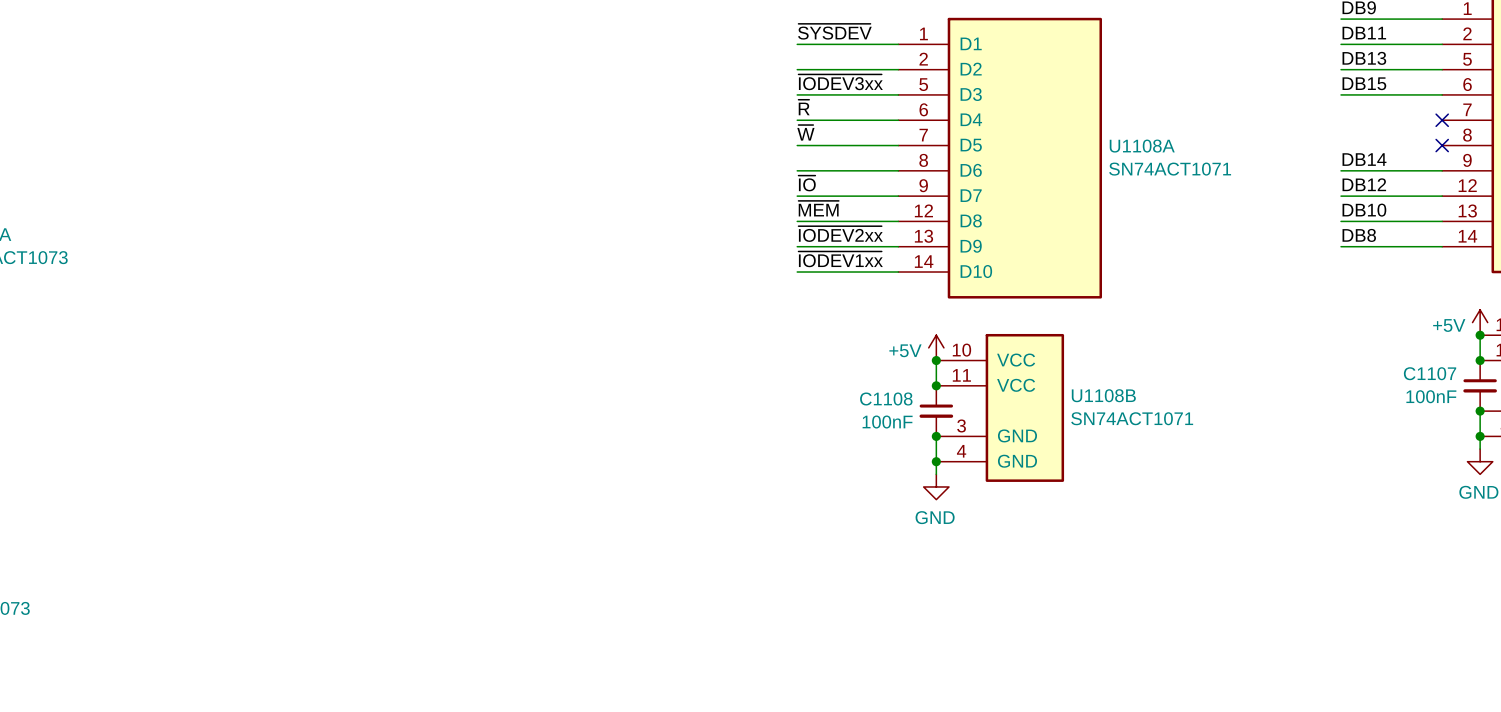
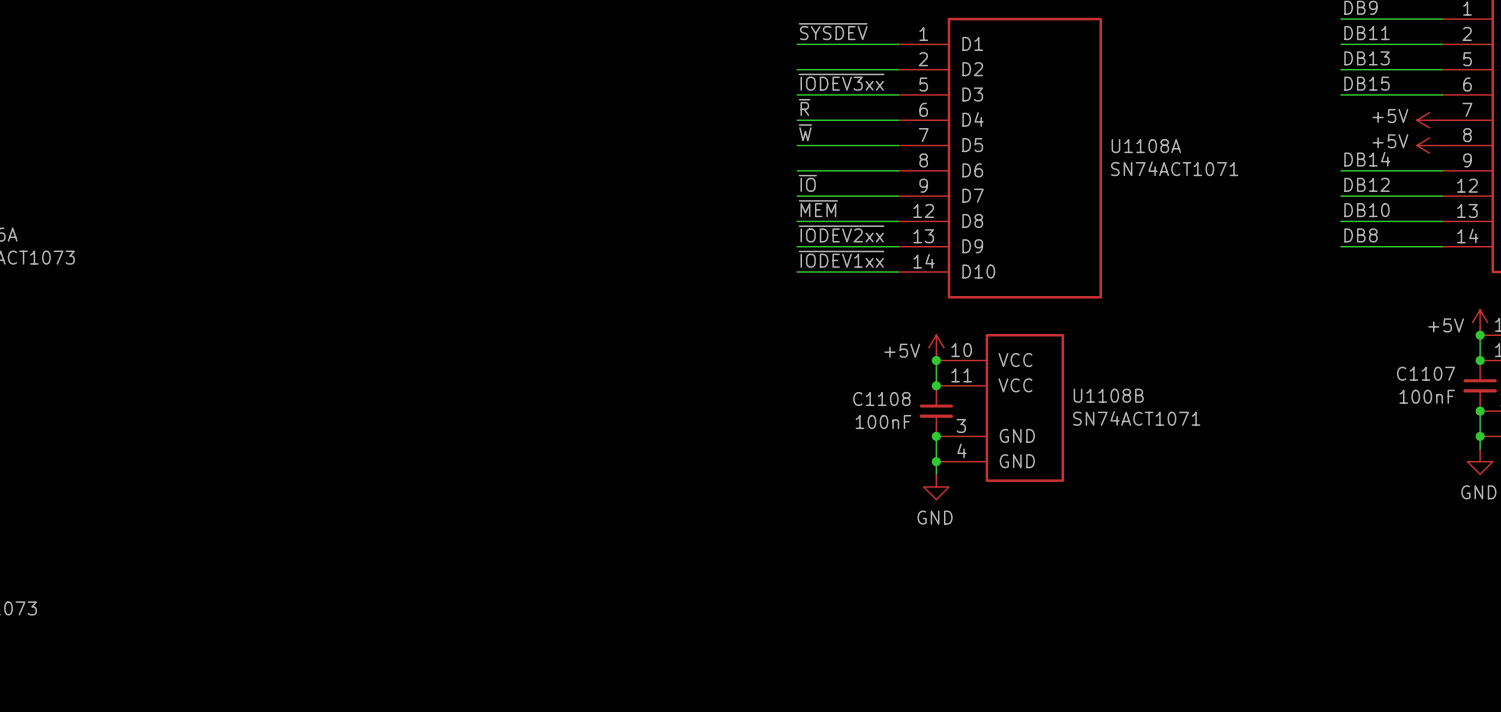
power symbol: none -> +5V (1429, 120)
no-connect mark: (1442, 120) -> none
power symbol: none -> +5V (1429, 145)
no-connect mark: (1442, 145) -> none

